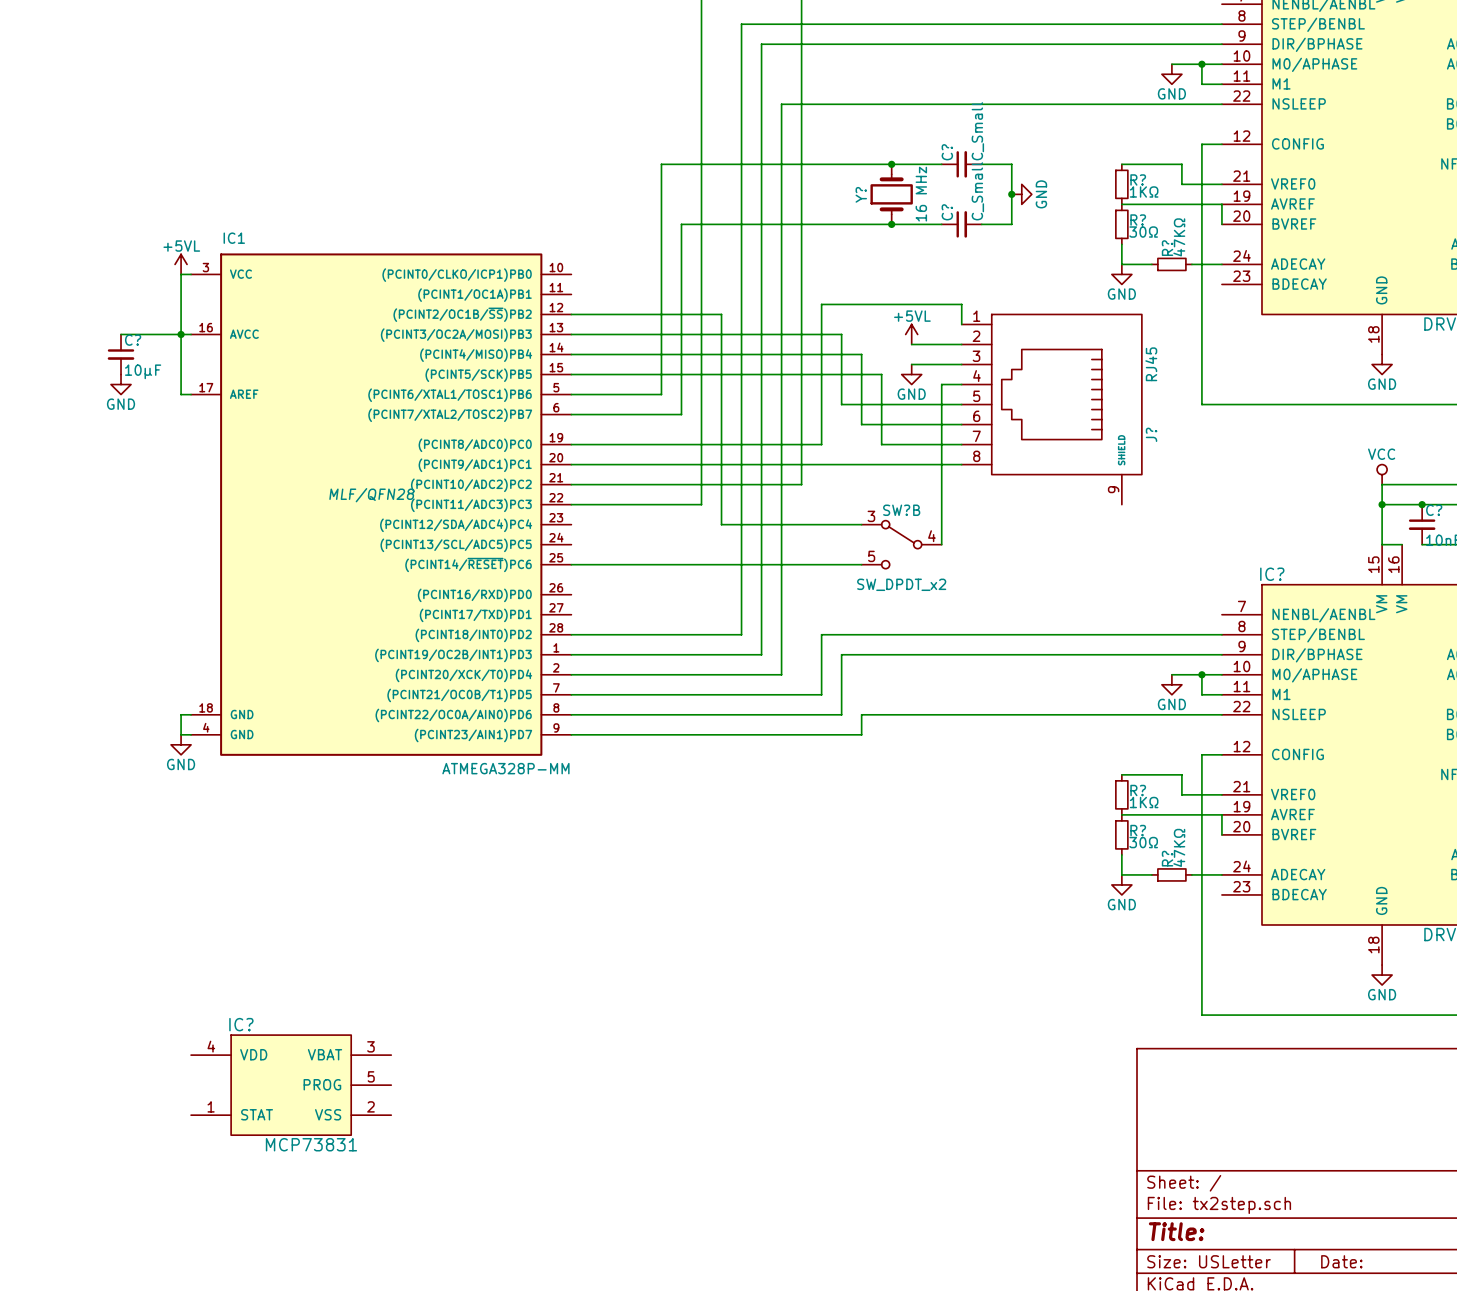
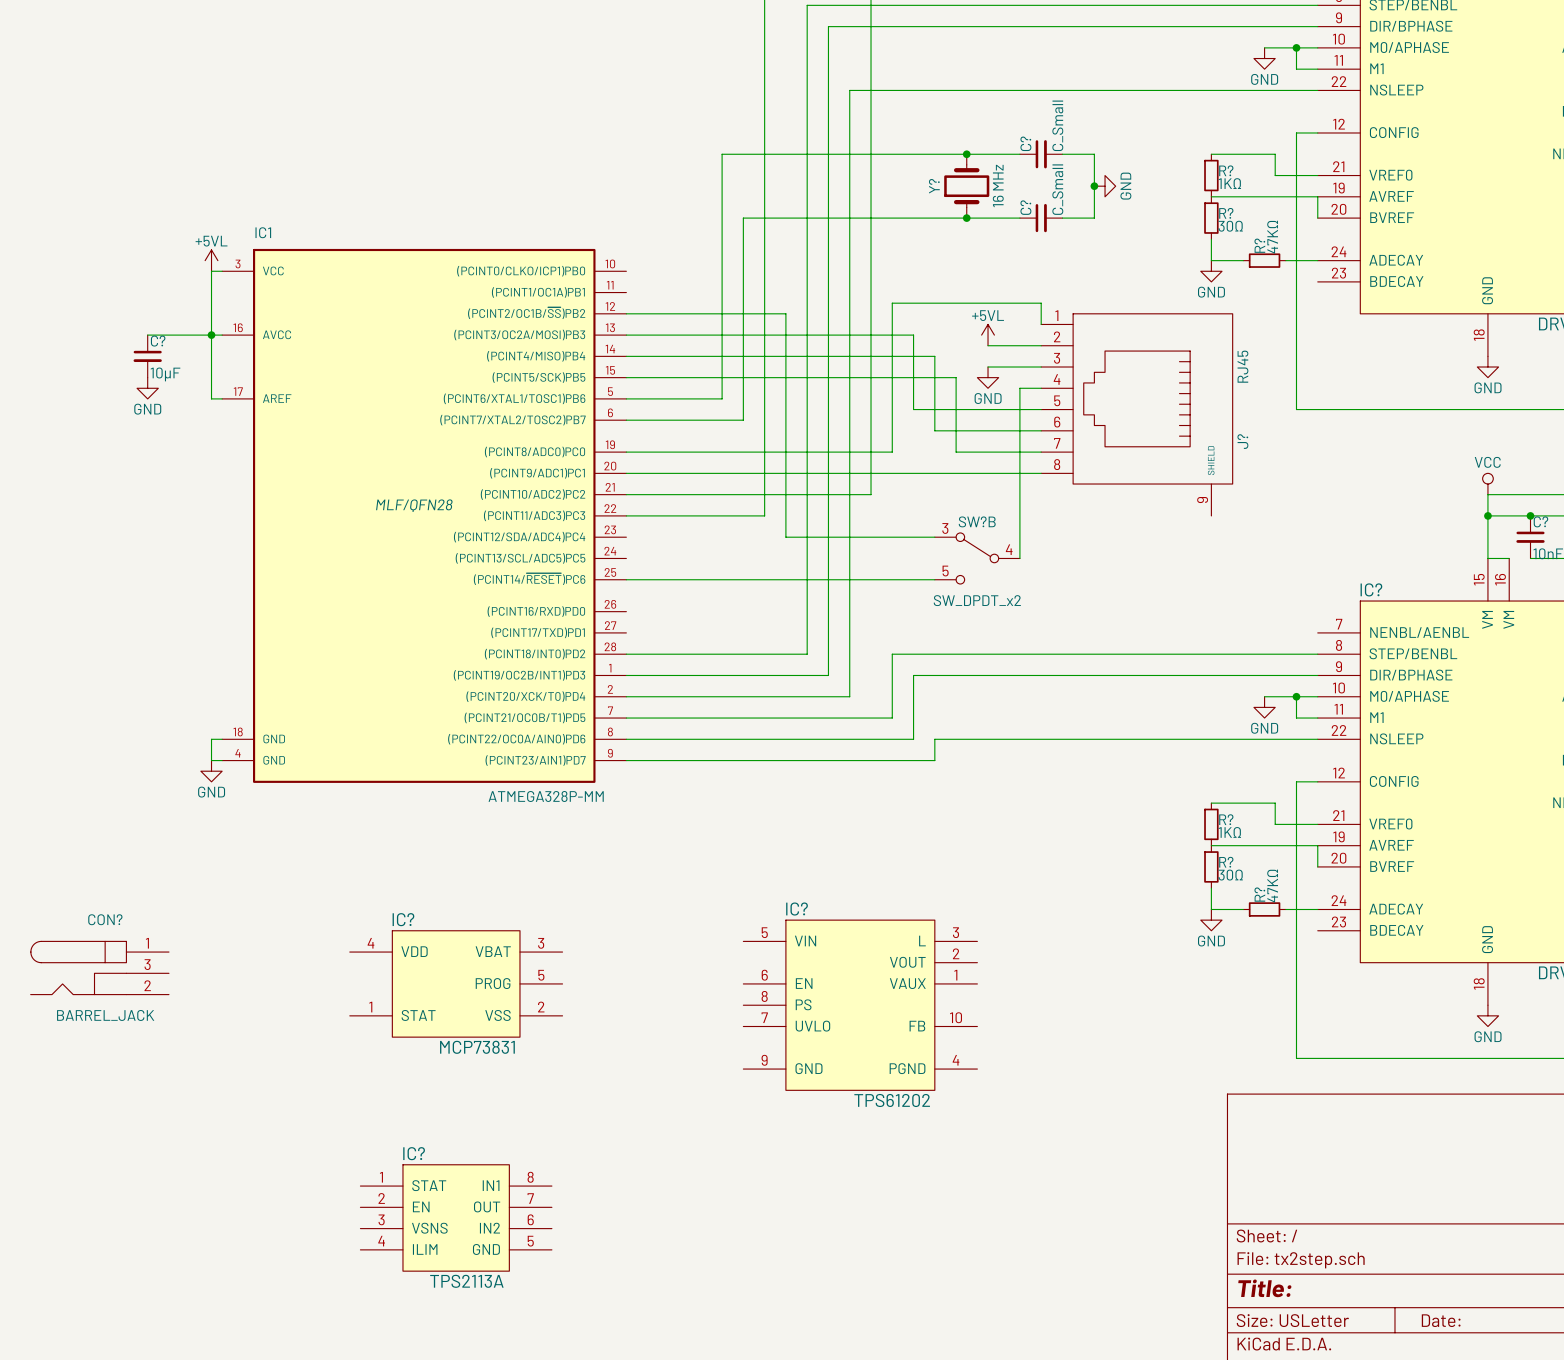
CON?: none -> BARREL_JACK (99, 967)
IC?: none -> TPS61202 (860, 1005)
IC? position: (291, 1085) -> (456, 983)
IC?: none -> TPS2113A (456, 1217)

